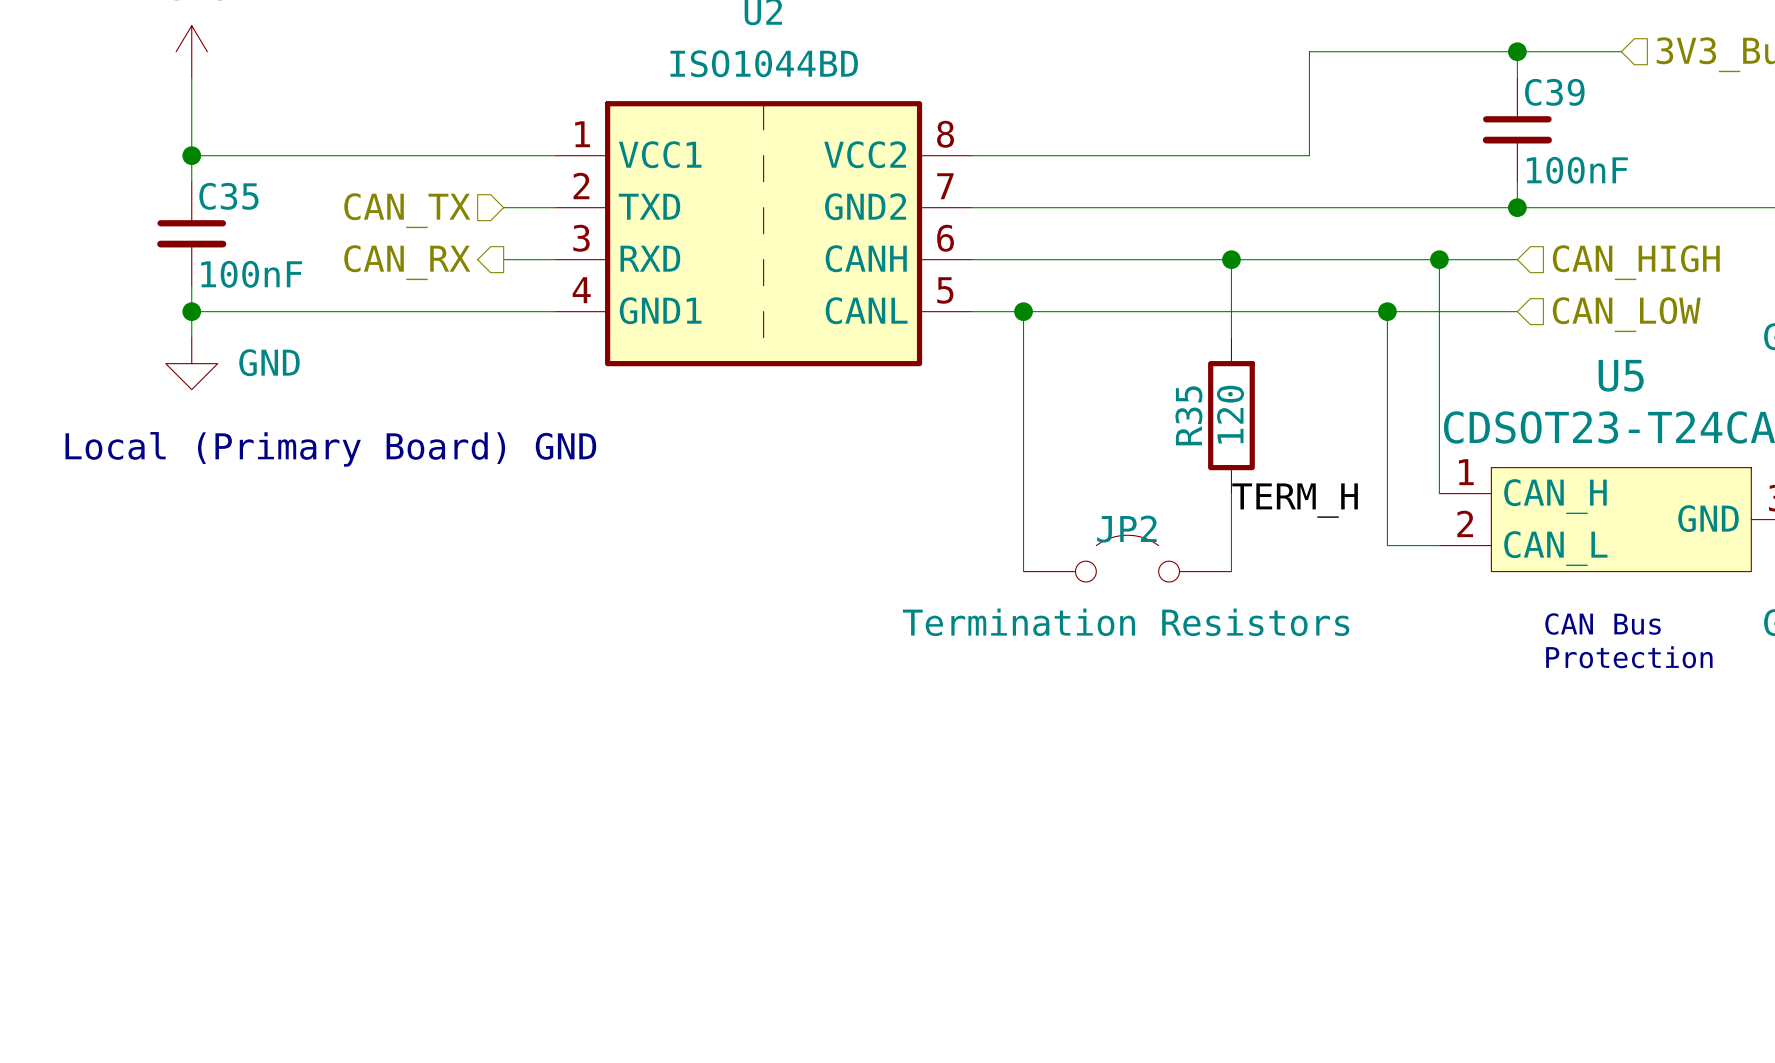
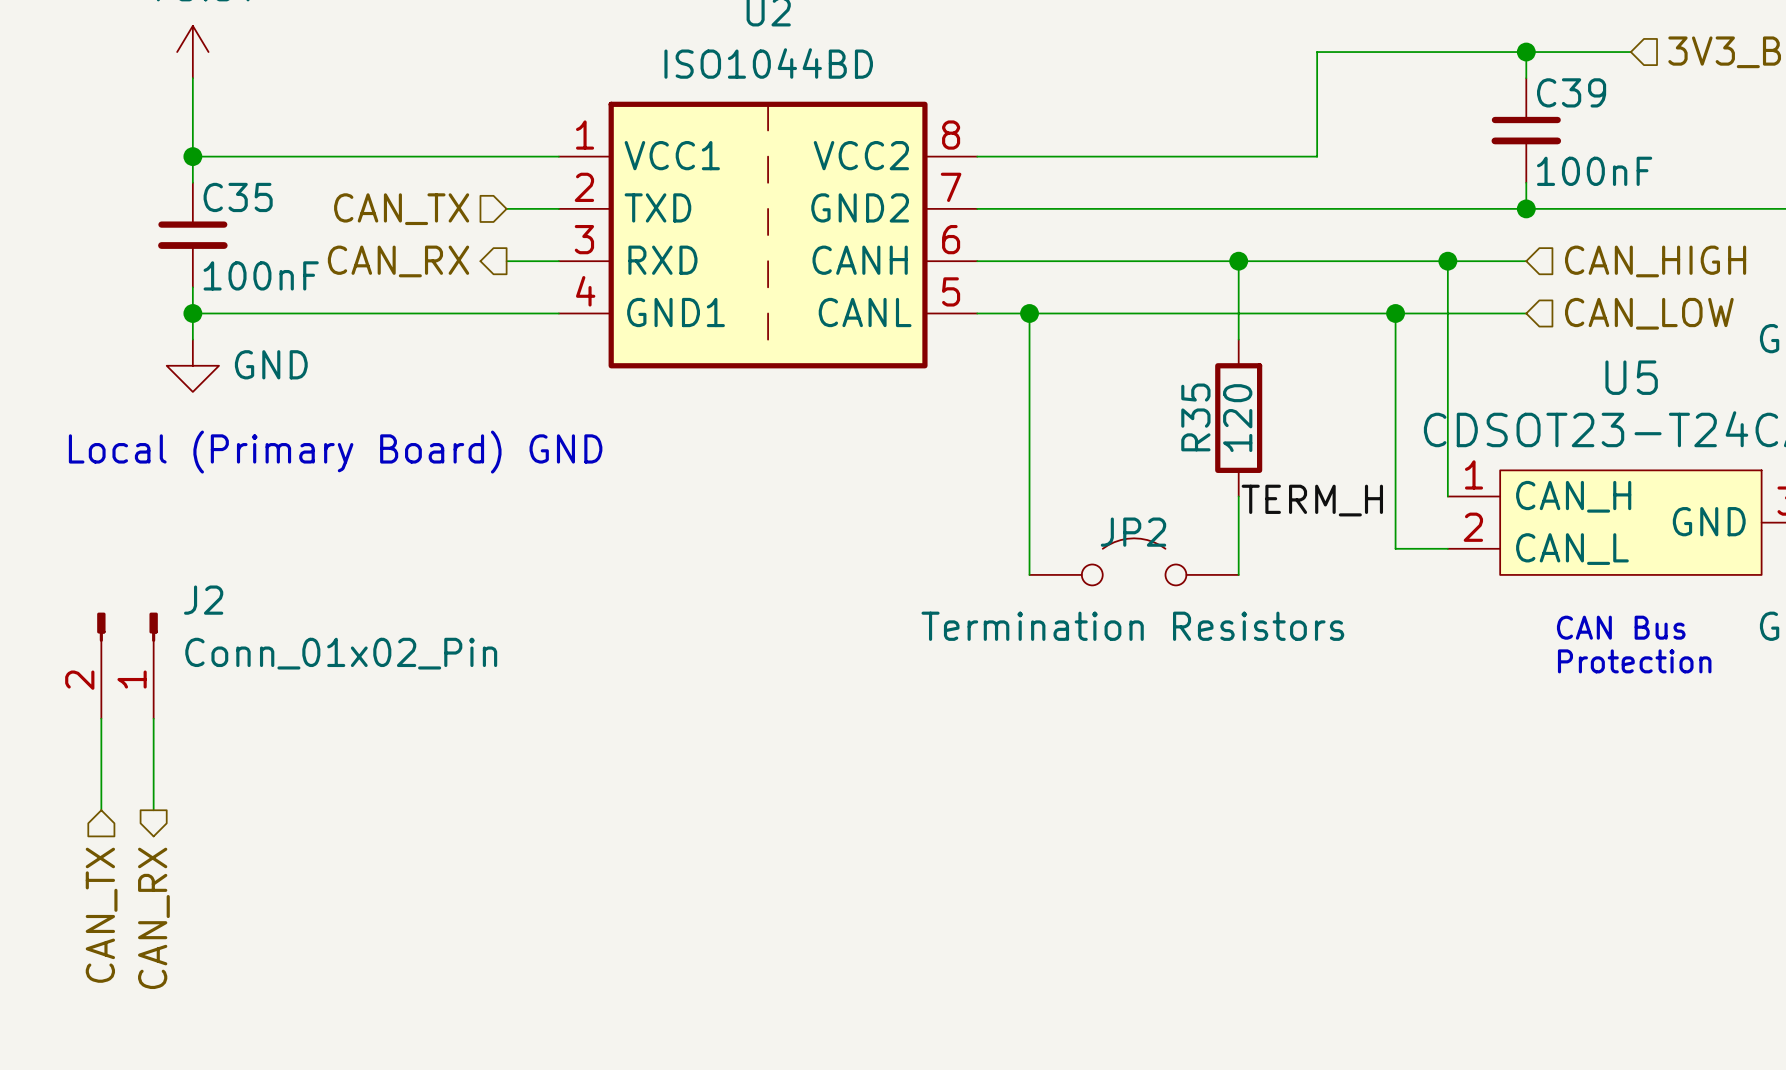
J2: none -> Conn_01x02_Pin (127, 665)
wire: none -> (101, 718) (101, 810)
wire: none -> (153, 718) (153, 810)
hierarchical label: none -> CAN_TX (101, 915)
hierarchical label: none -> CAN_RX (153, 918)

